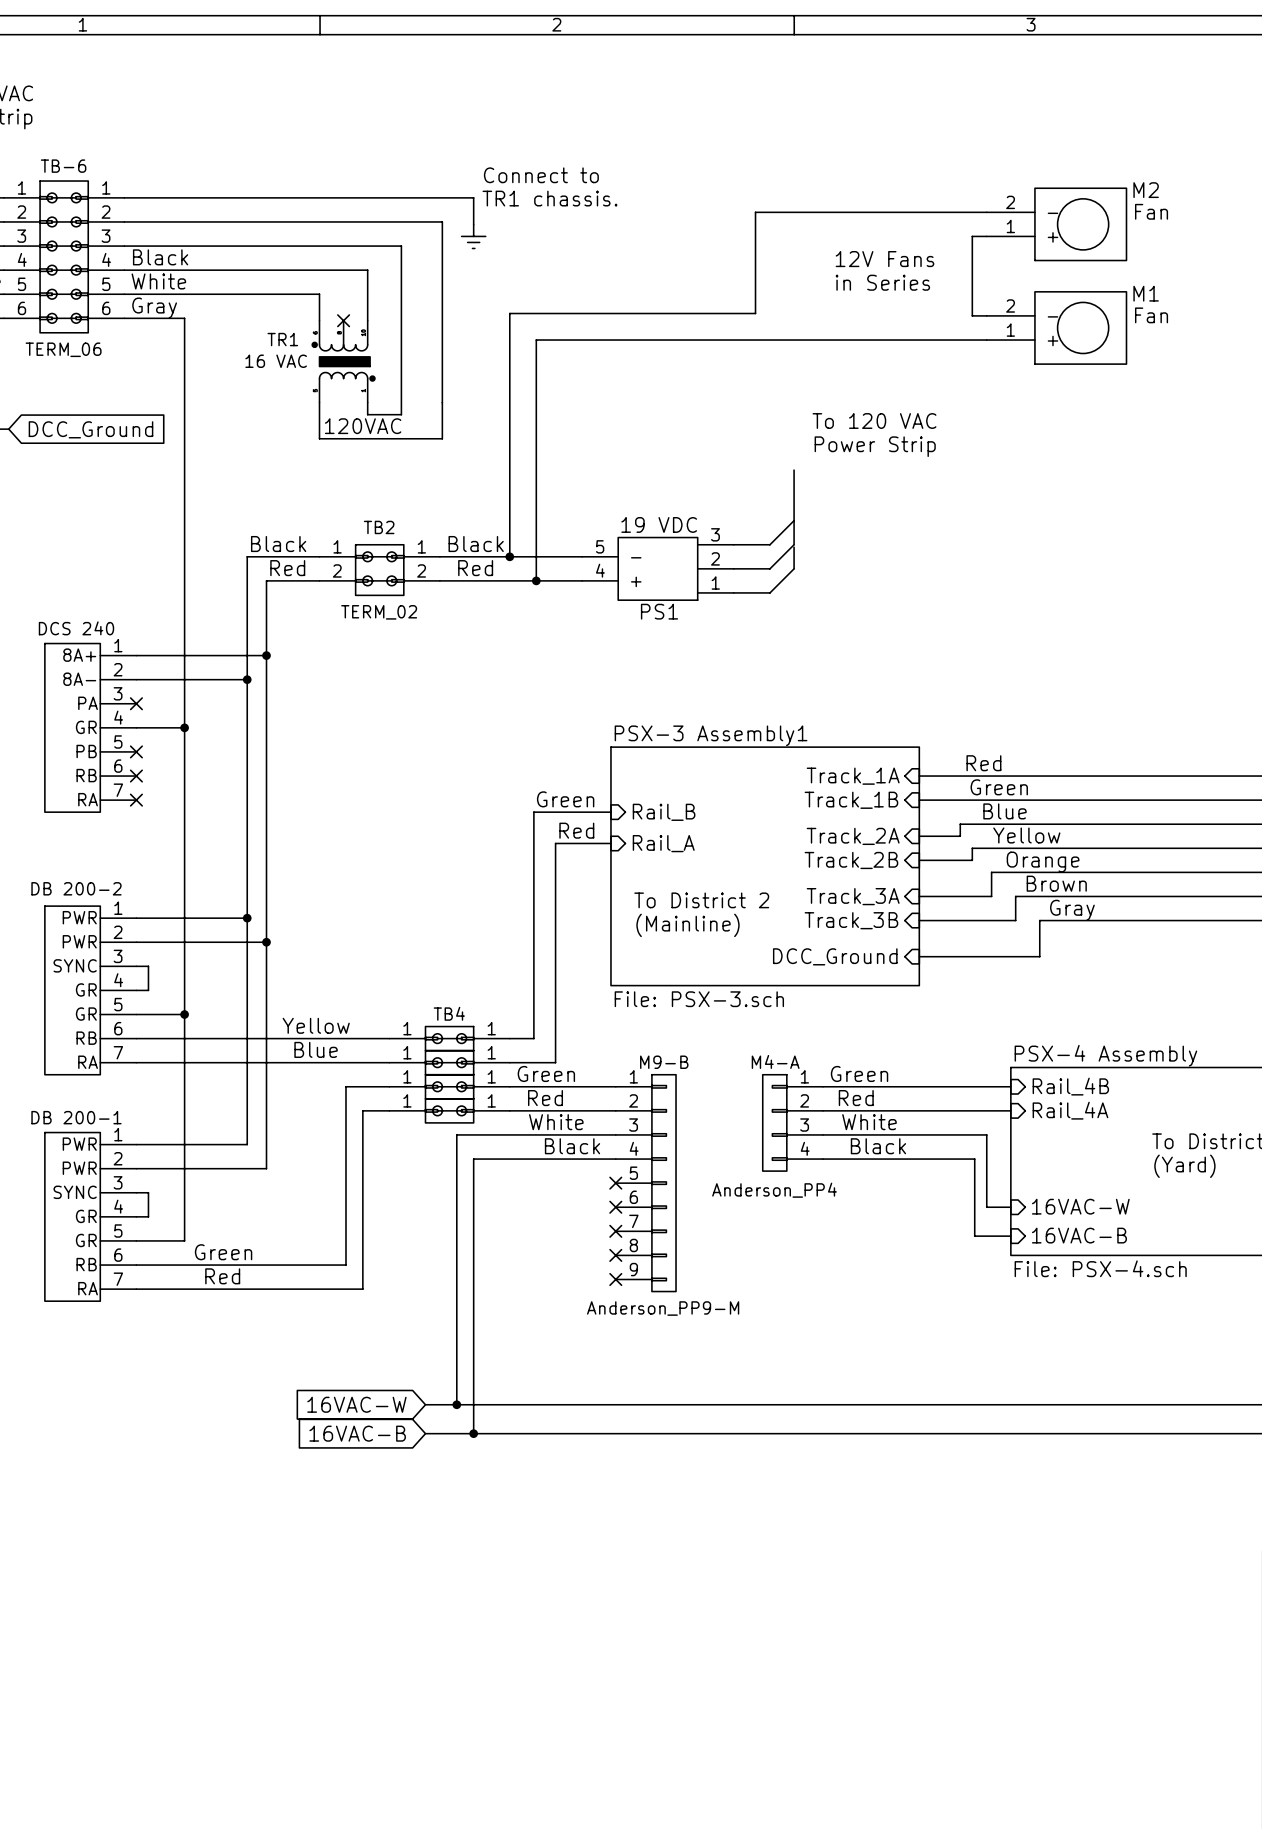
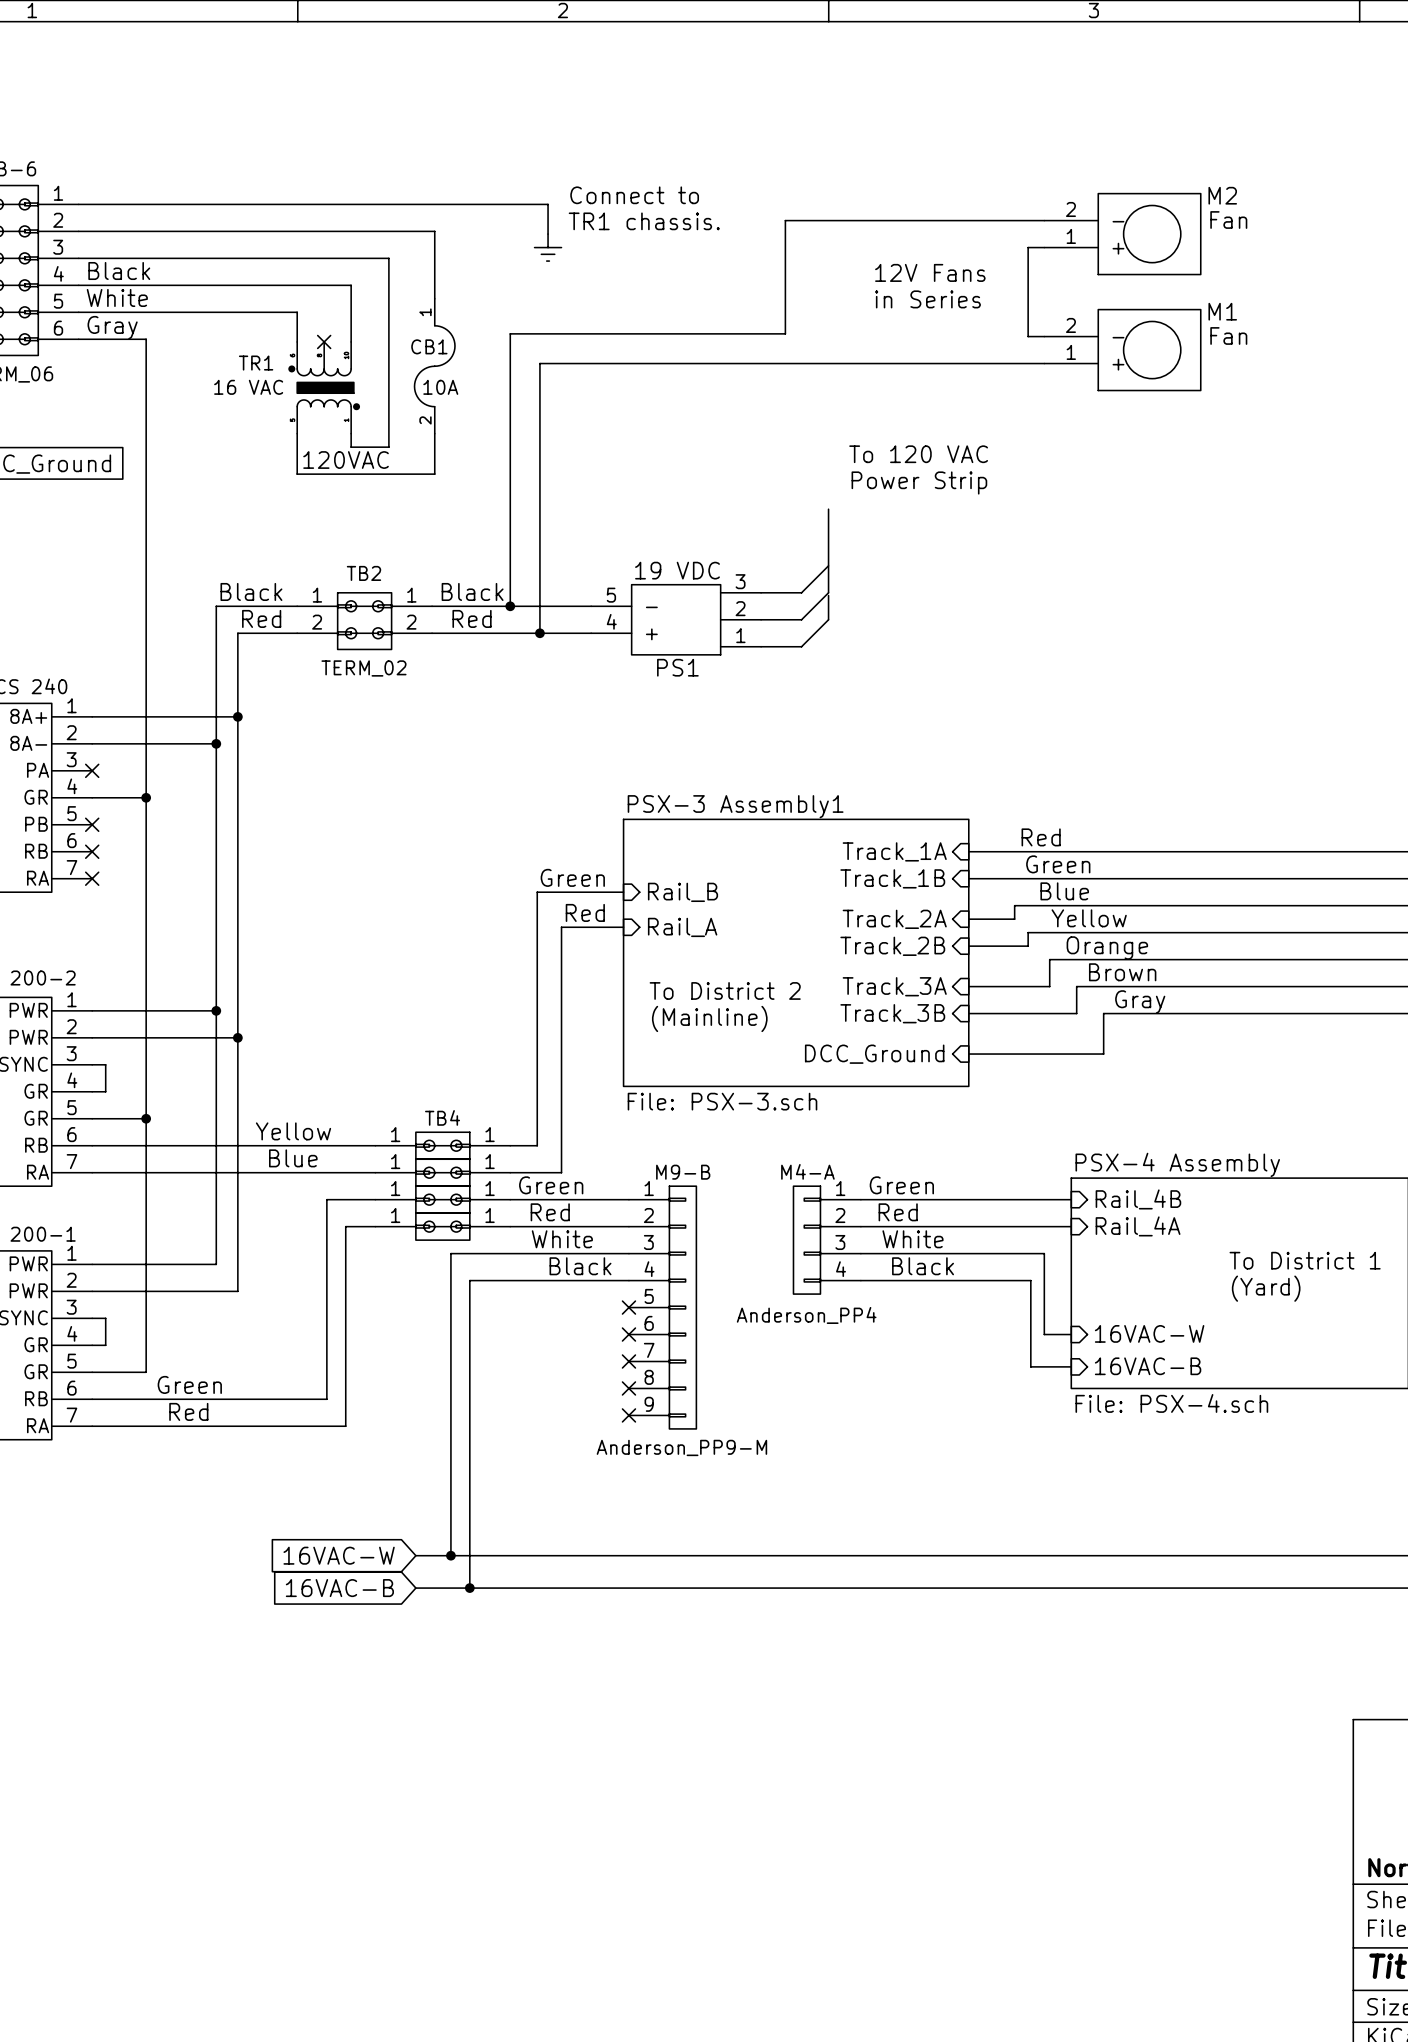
text position: Connect to (541, 175) -> Connect to (634, 195)
wire: (473, 197) (473, 224) -> (469, 204) (548, 204) (548, 234)
text position: TR1 chassis. (549, 198) -> TR1 chassis. (644, 221)
power symbol position: (473, 236) -> (548, 247)
wire: (442, 282) (442, 402) -> none
CB1: none -> 10A (434, 366)

